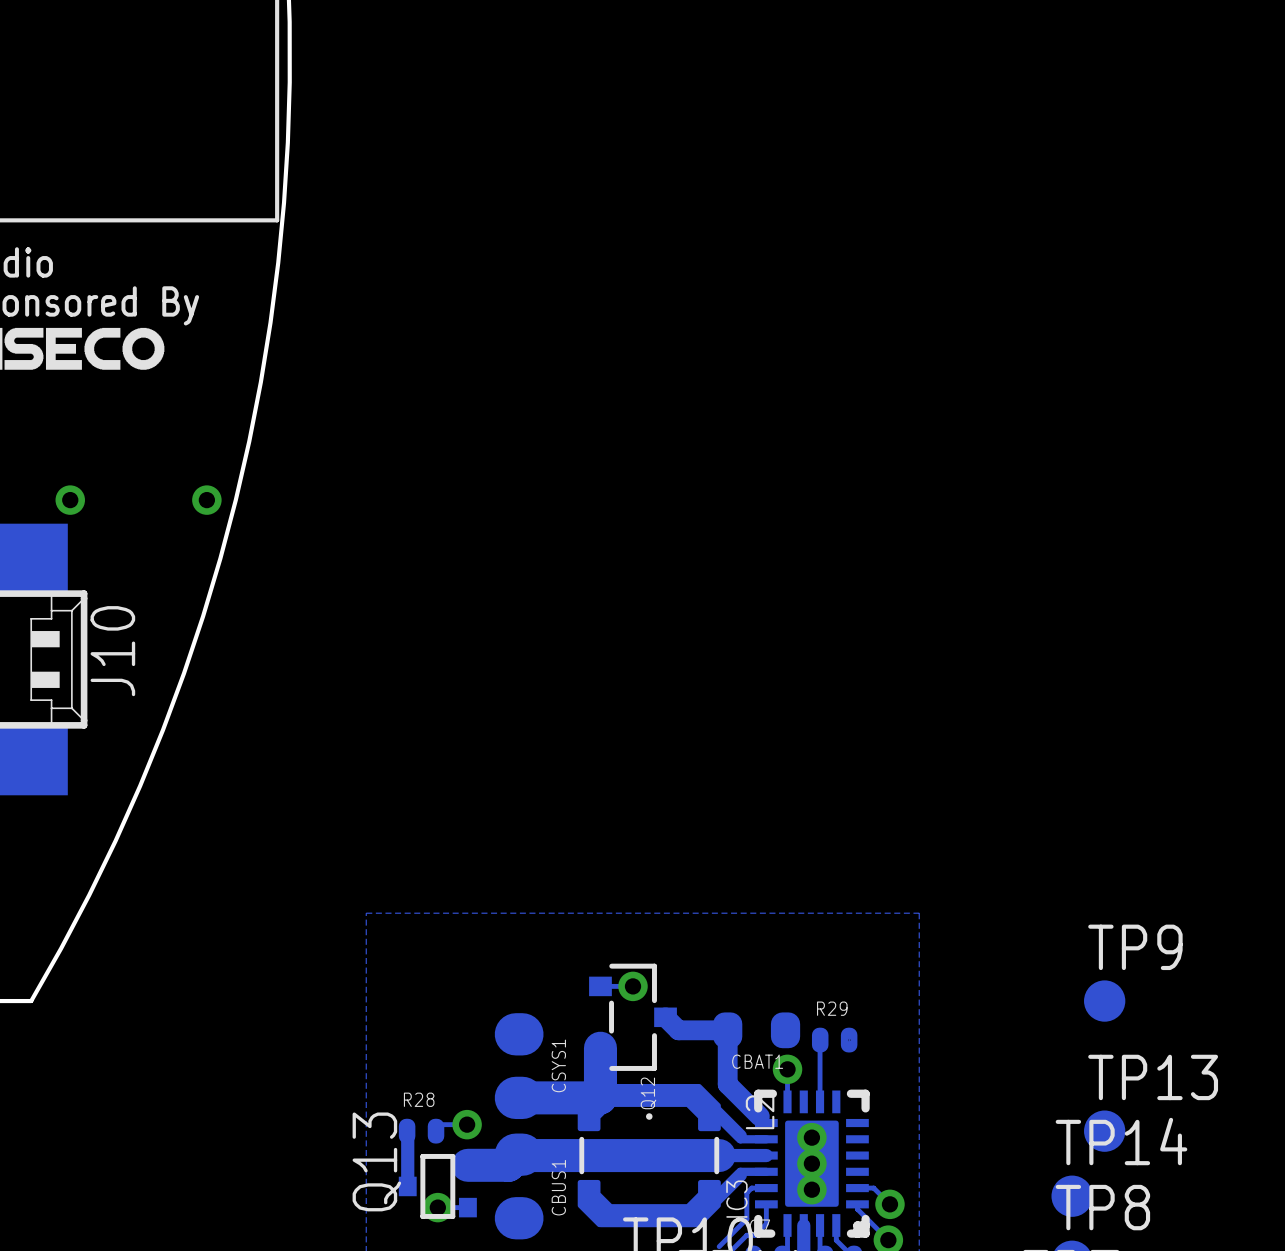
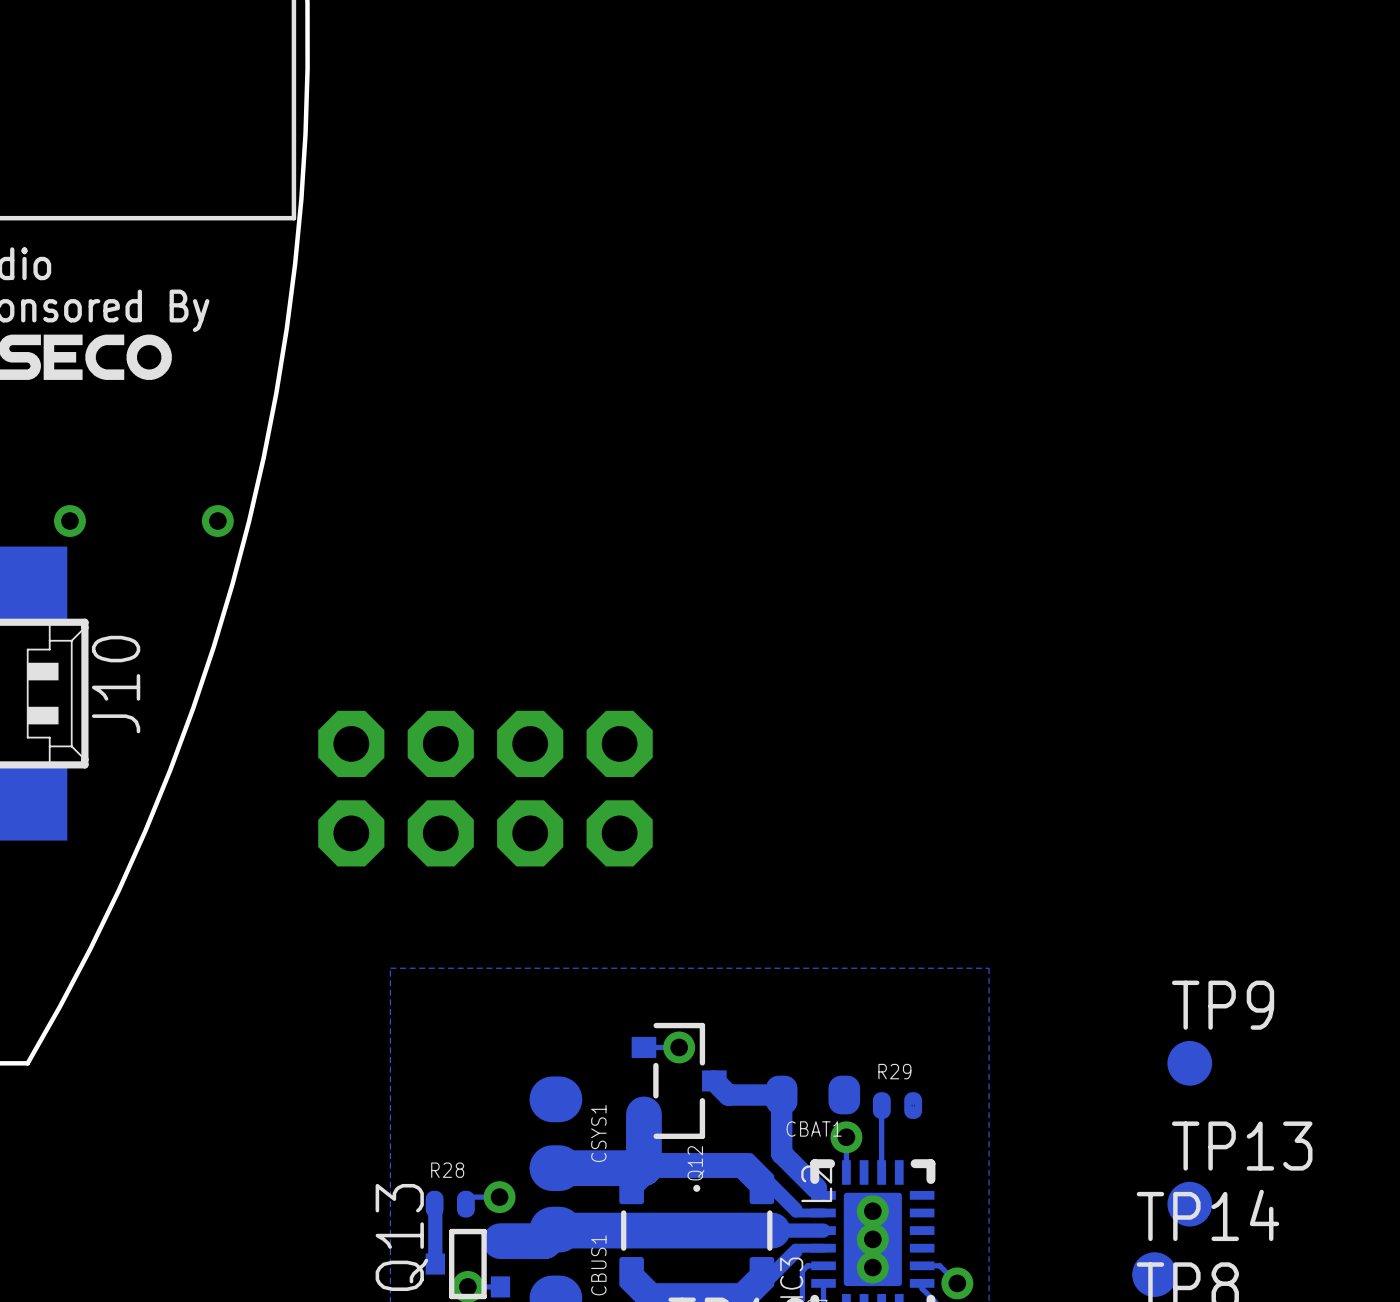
part: none -> (485, 788)

